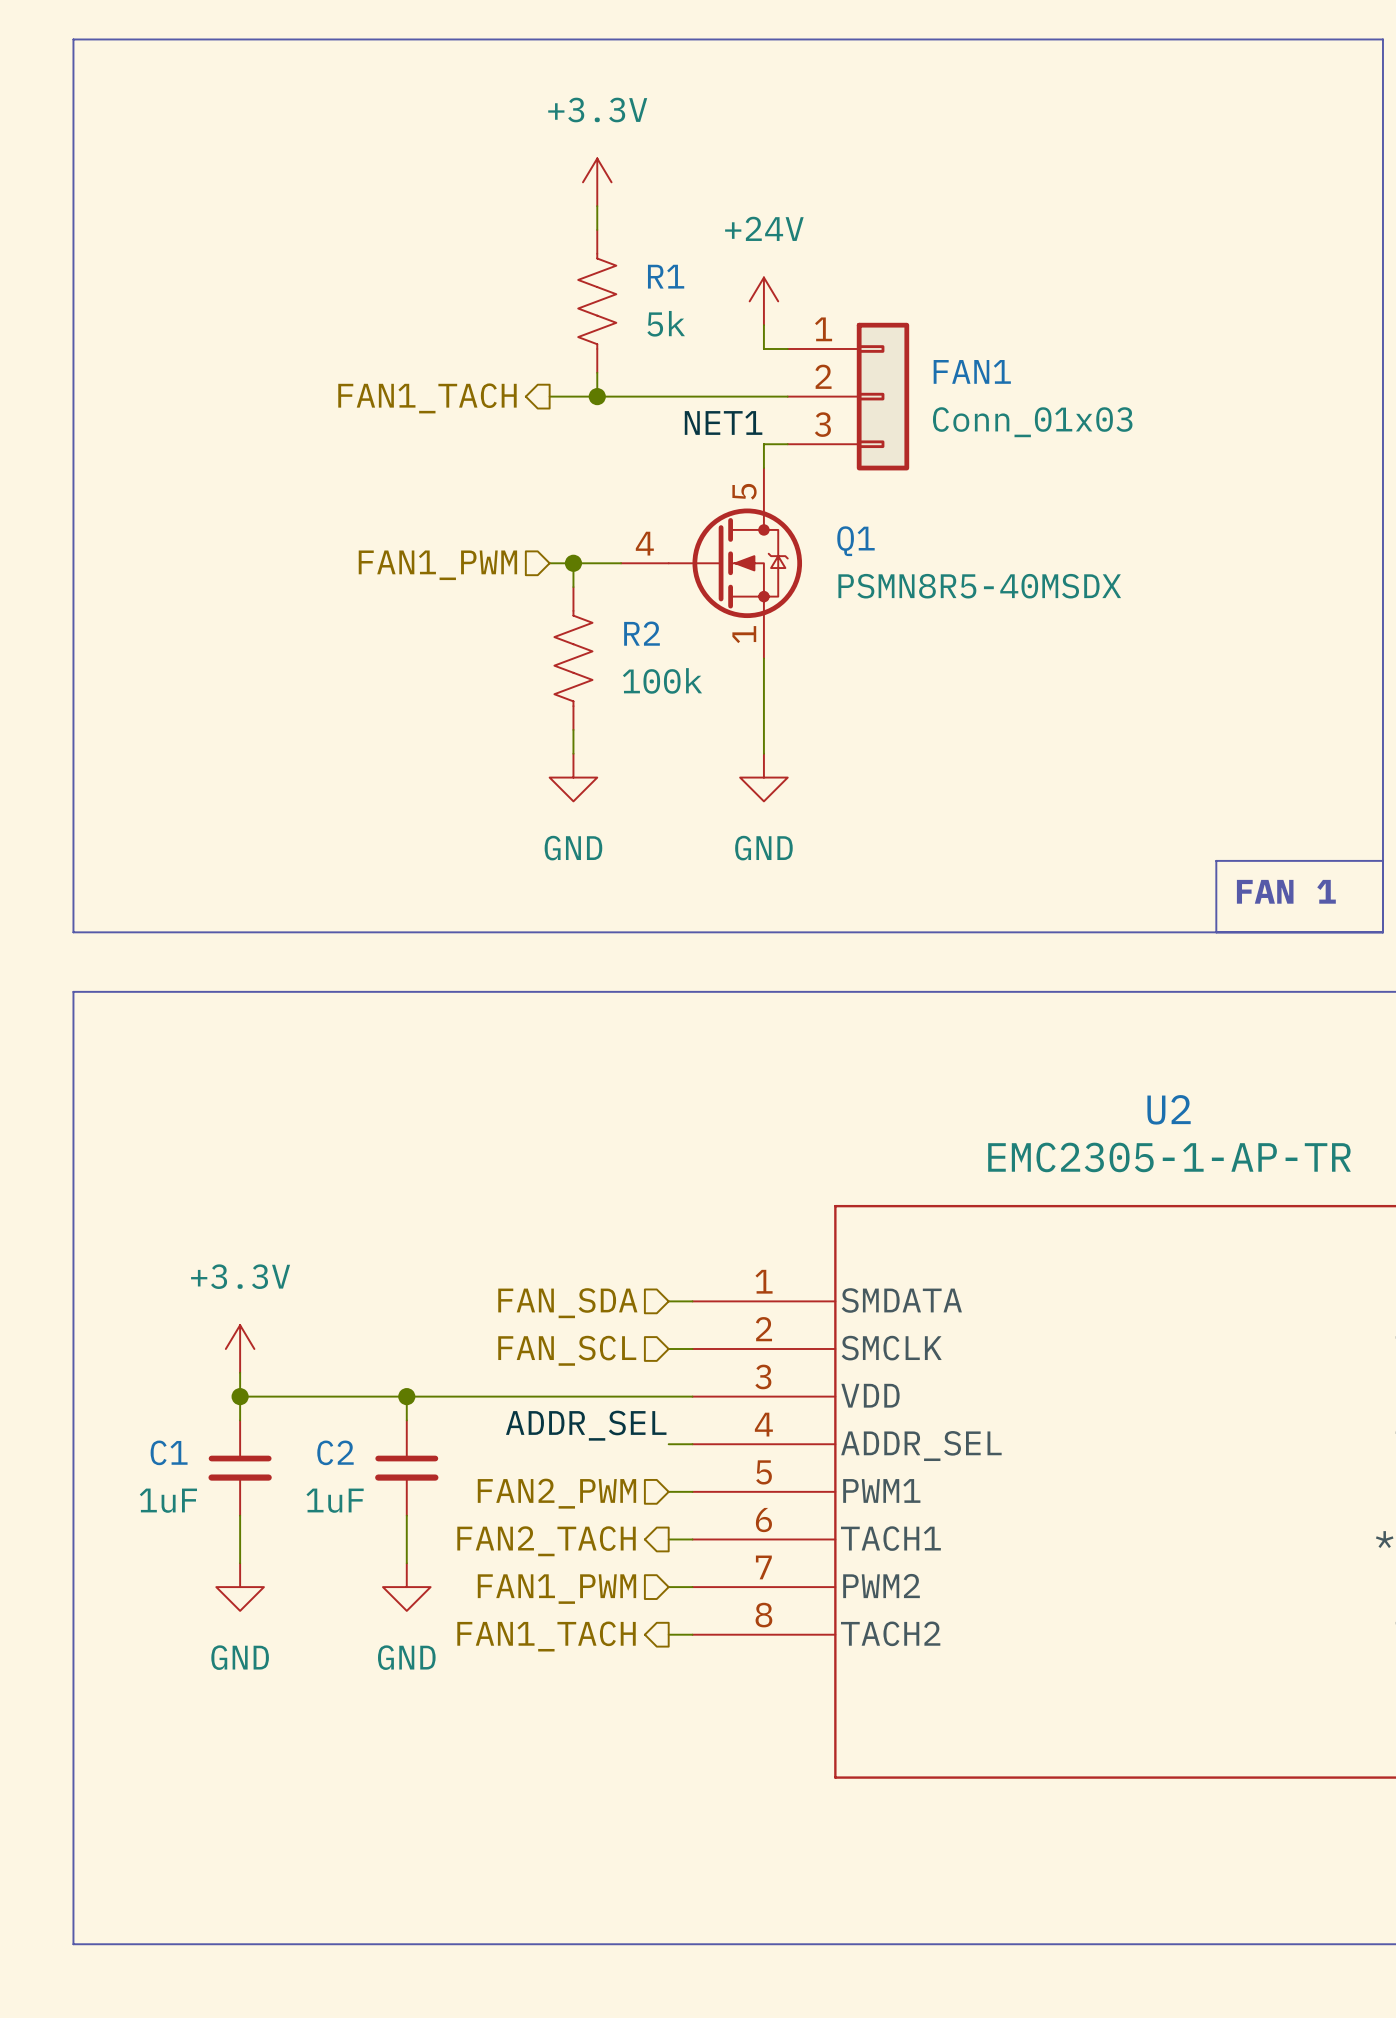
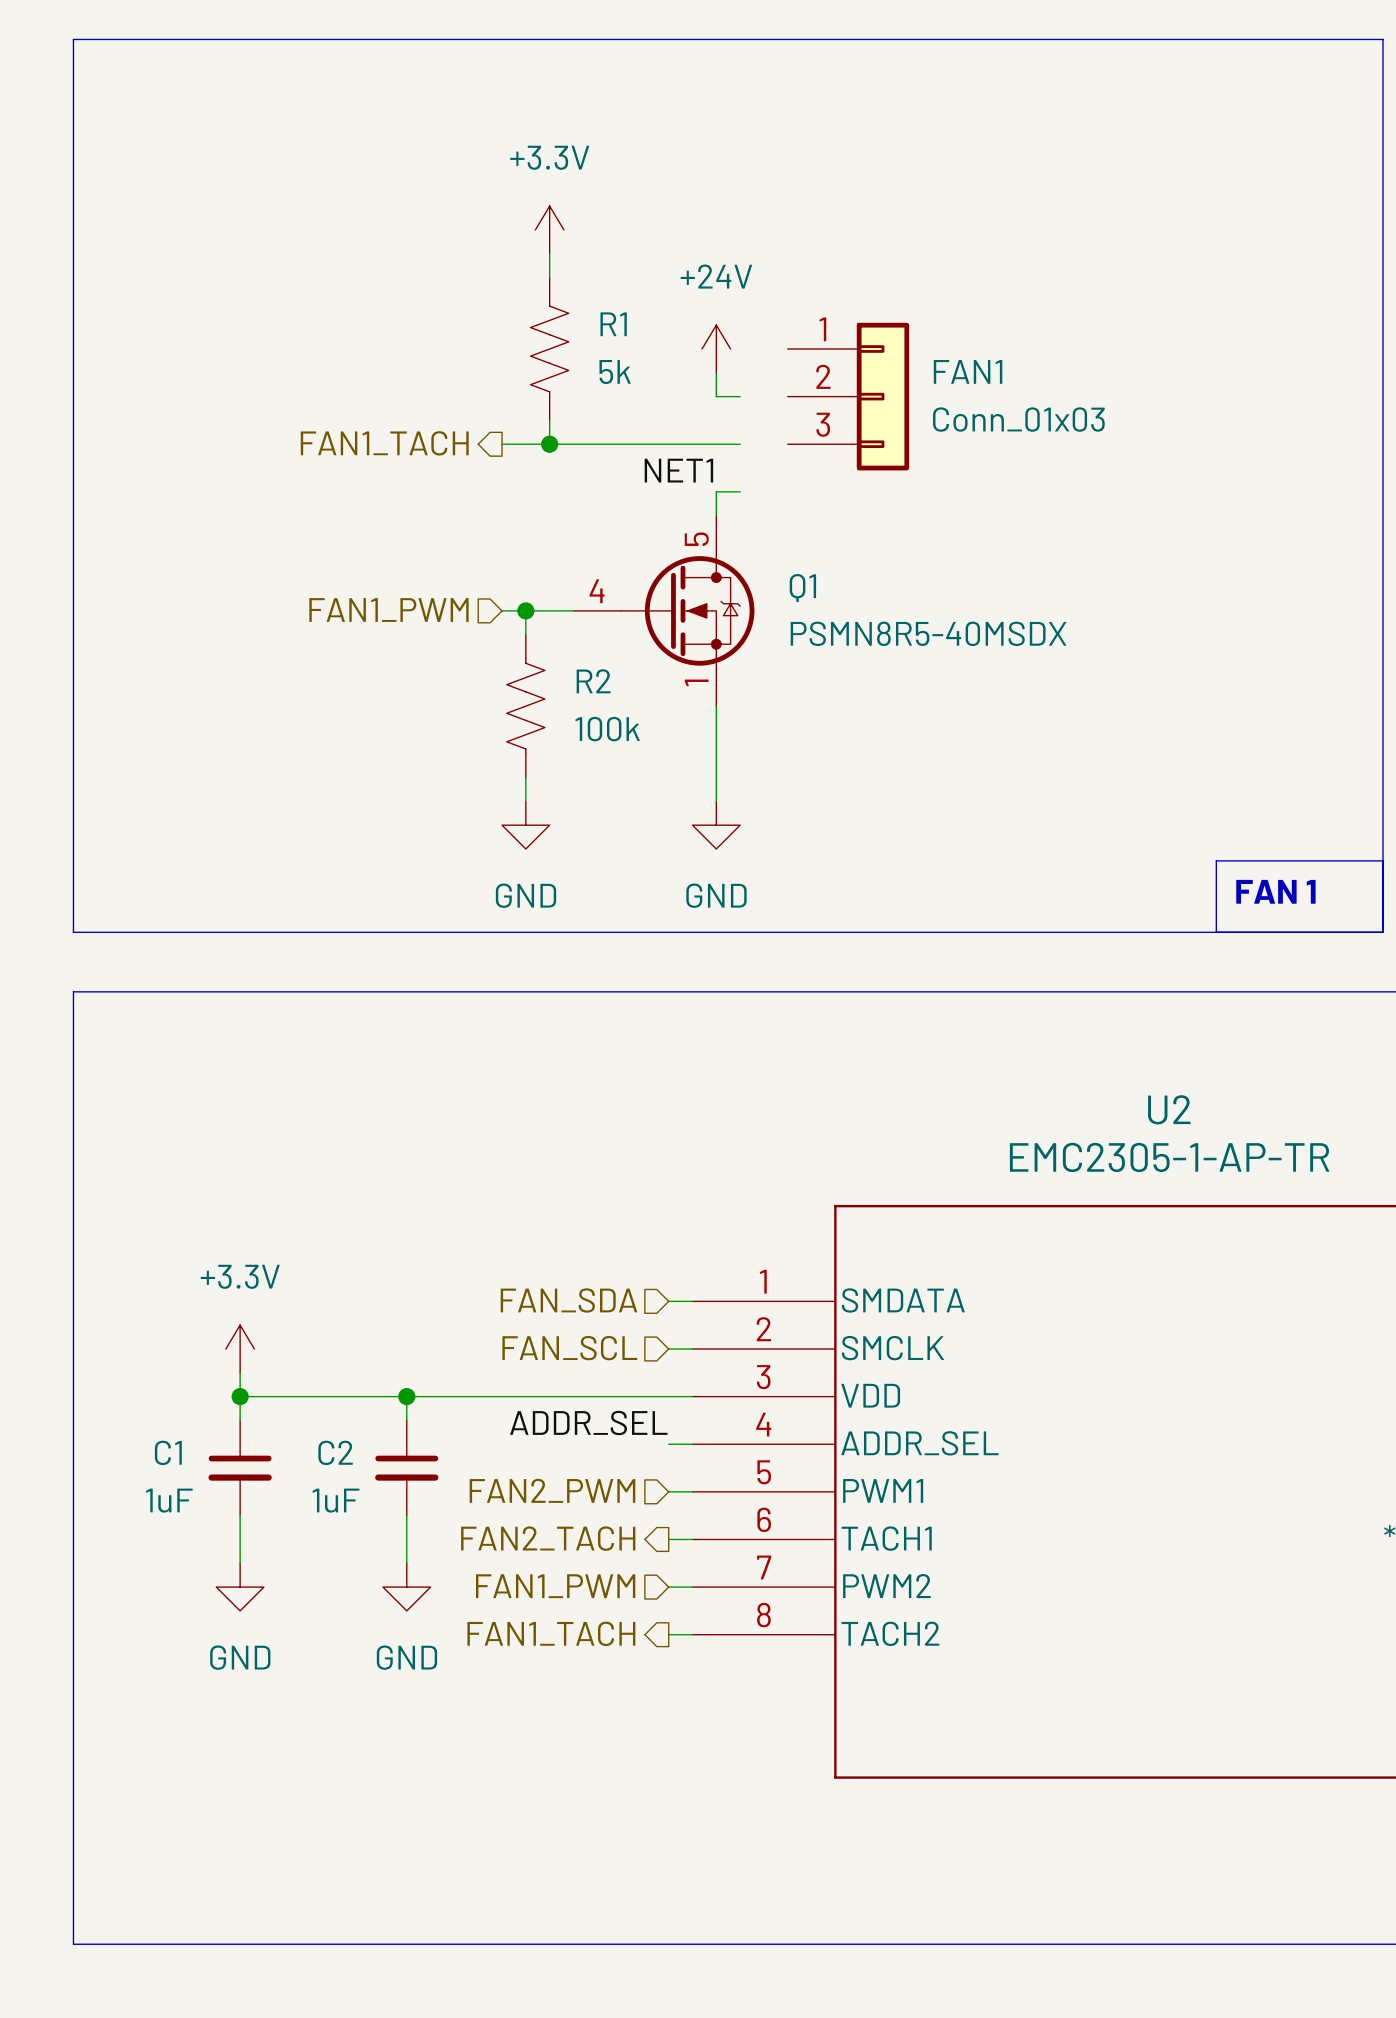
power symbol position: +3.3V (597, 182) -> +3.3V (549, 229)
wire: (597, 206) (597, 229) -> (549, 253) (549, 277)
R1 position: (597, 301) -> (549, 348)
power symbol position: +24V (763, 301) -> +24V (716, 348)
wire: (763, 325) (763, 348) (787, 348) -> none
wire: (597, 372) (597, 396) -> (549, 420) (549, 444)
wire: (549, 396) (716, 396) -> (716, 372) (716, 396)
junction: (597, 396) -> none
wire: (740, 396) (787, 396) -> none
hierarchical label position: FAN1_TACH (427, 398) -> FAN1_TACH (384, 443)
label position: NET1 (723, 422) -> NET1 (678, 470)
wire: none -> (502, 444) (740, 444)
junction: none -> (549, 444)
wire: (787, 444) (763, 444) (763, 468) -> (740, 491) (716, 491) (716, 515)
wire: (549, 563) (621, 563) -> (502, 610) (573, 610)
wire: (573, 563) (573, 587) -> (525, 610) (525, 634)
junction: (573, 563) -> none
Q1 position: (711, 563) -> (663, 610)
hierarchical label position: FAN1_PWM (437, 565) -> FAN1_PWM (388, 609)
junction: none -> (525, 610)
R2 position: (573, 658) -> (525, 706)
wire: (763, 658) (763, 753) -> (716, 706) (716, 801)
wire: (573, 729) (573, 753) -> (525, 777) (525, 801)
power symbol position: GND (573, 777) -> GND (525, 825)
power symbol position: GND (763, 777) -> GND (716, 825)

